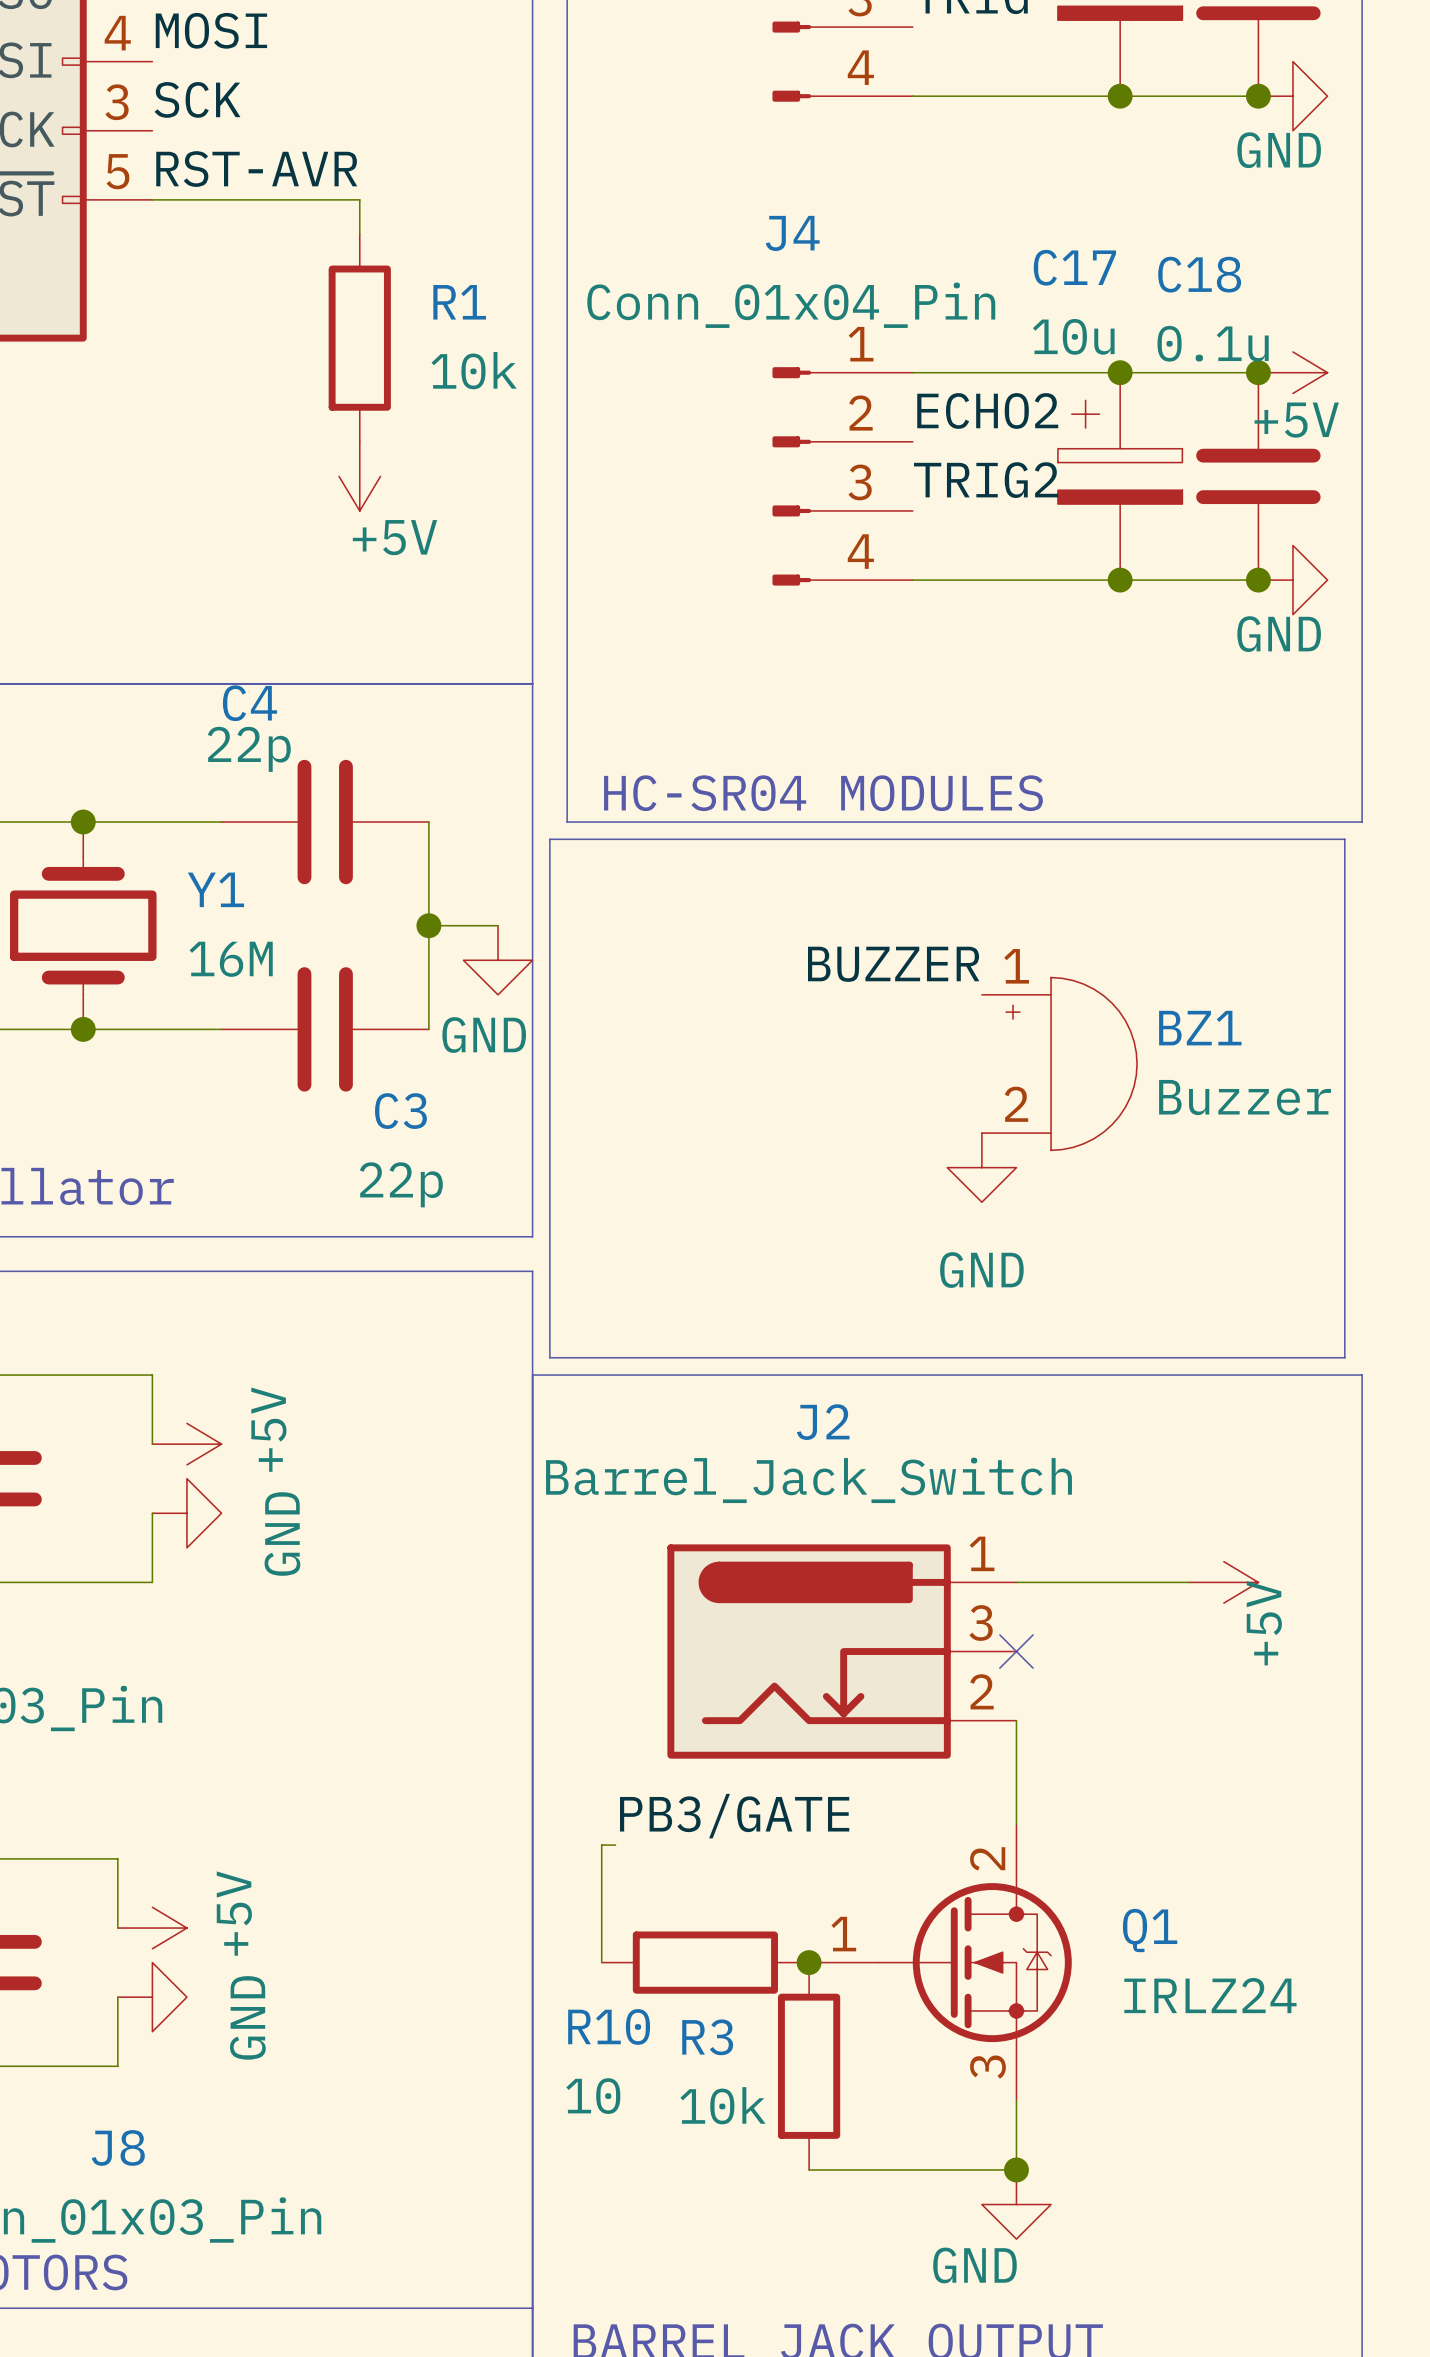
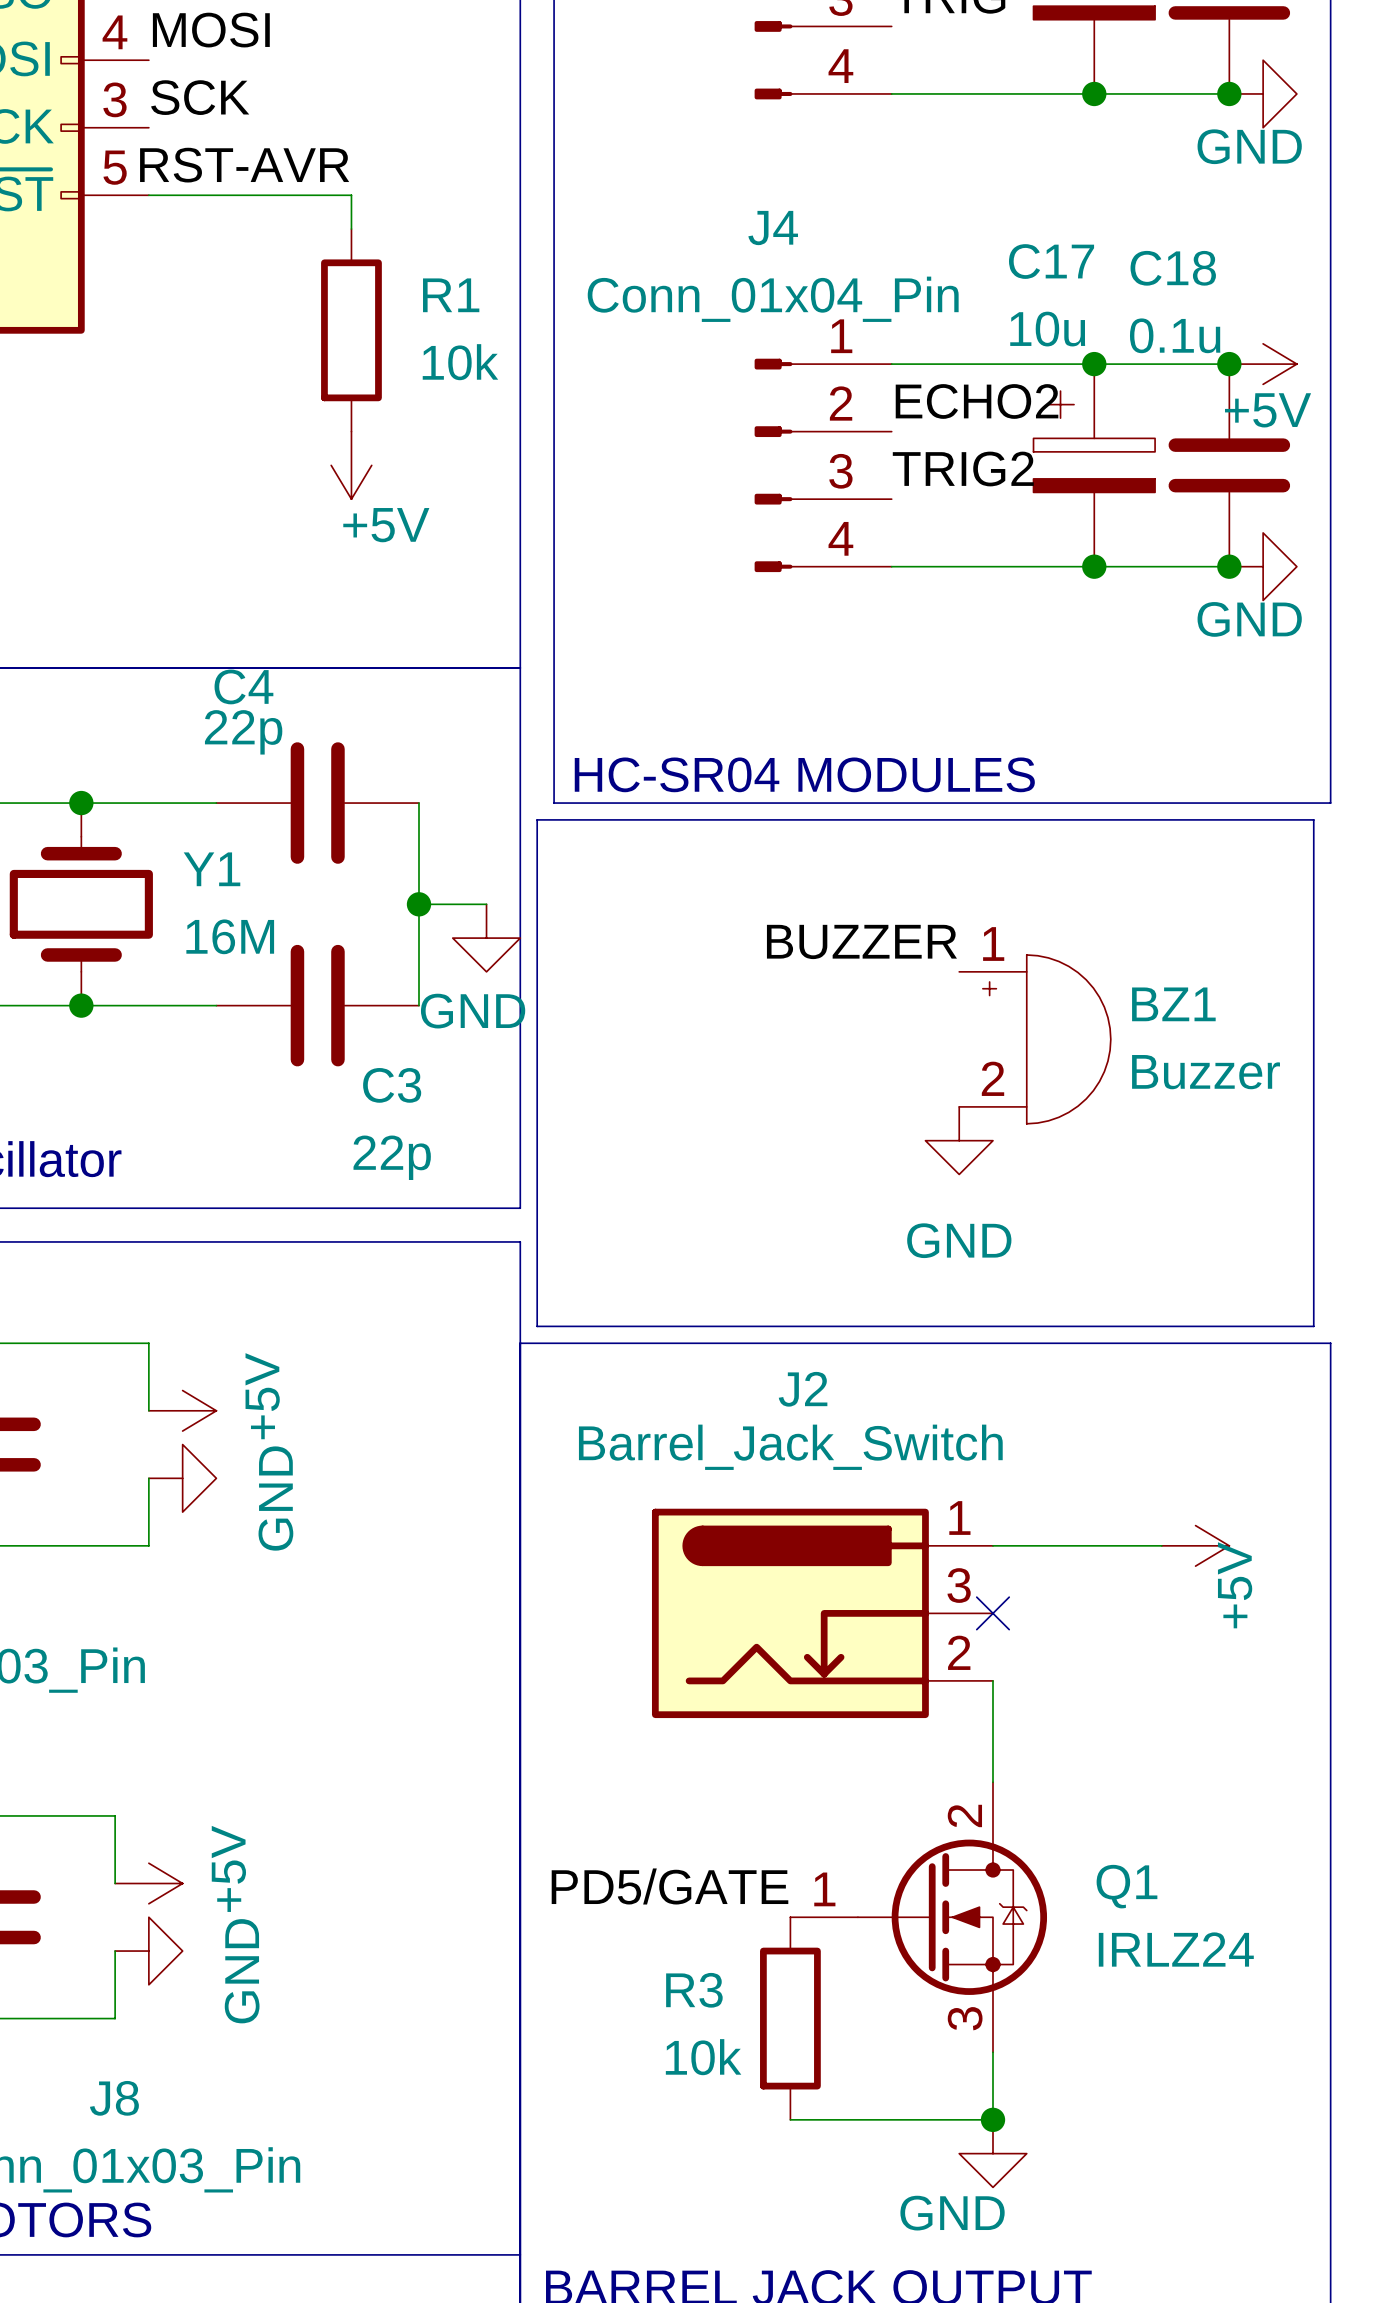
label: PB3/GATE (734, 1816) -> none
wire: (615, 1845) (601, 1845) (601, 1962) -> none
label: none -> PD5/GATE (670, 1886)
R10: 10 (705, 1962) -> none
junction: (809, 1962) -> none

